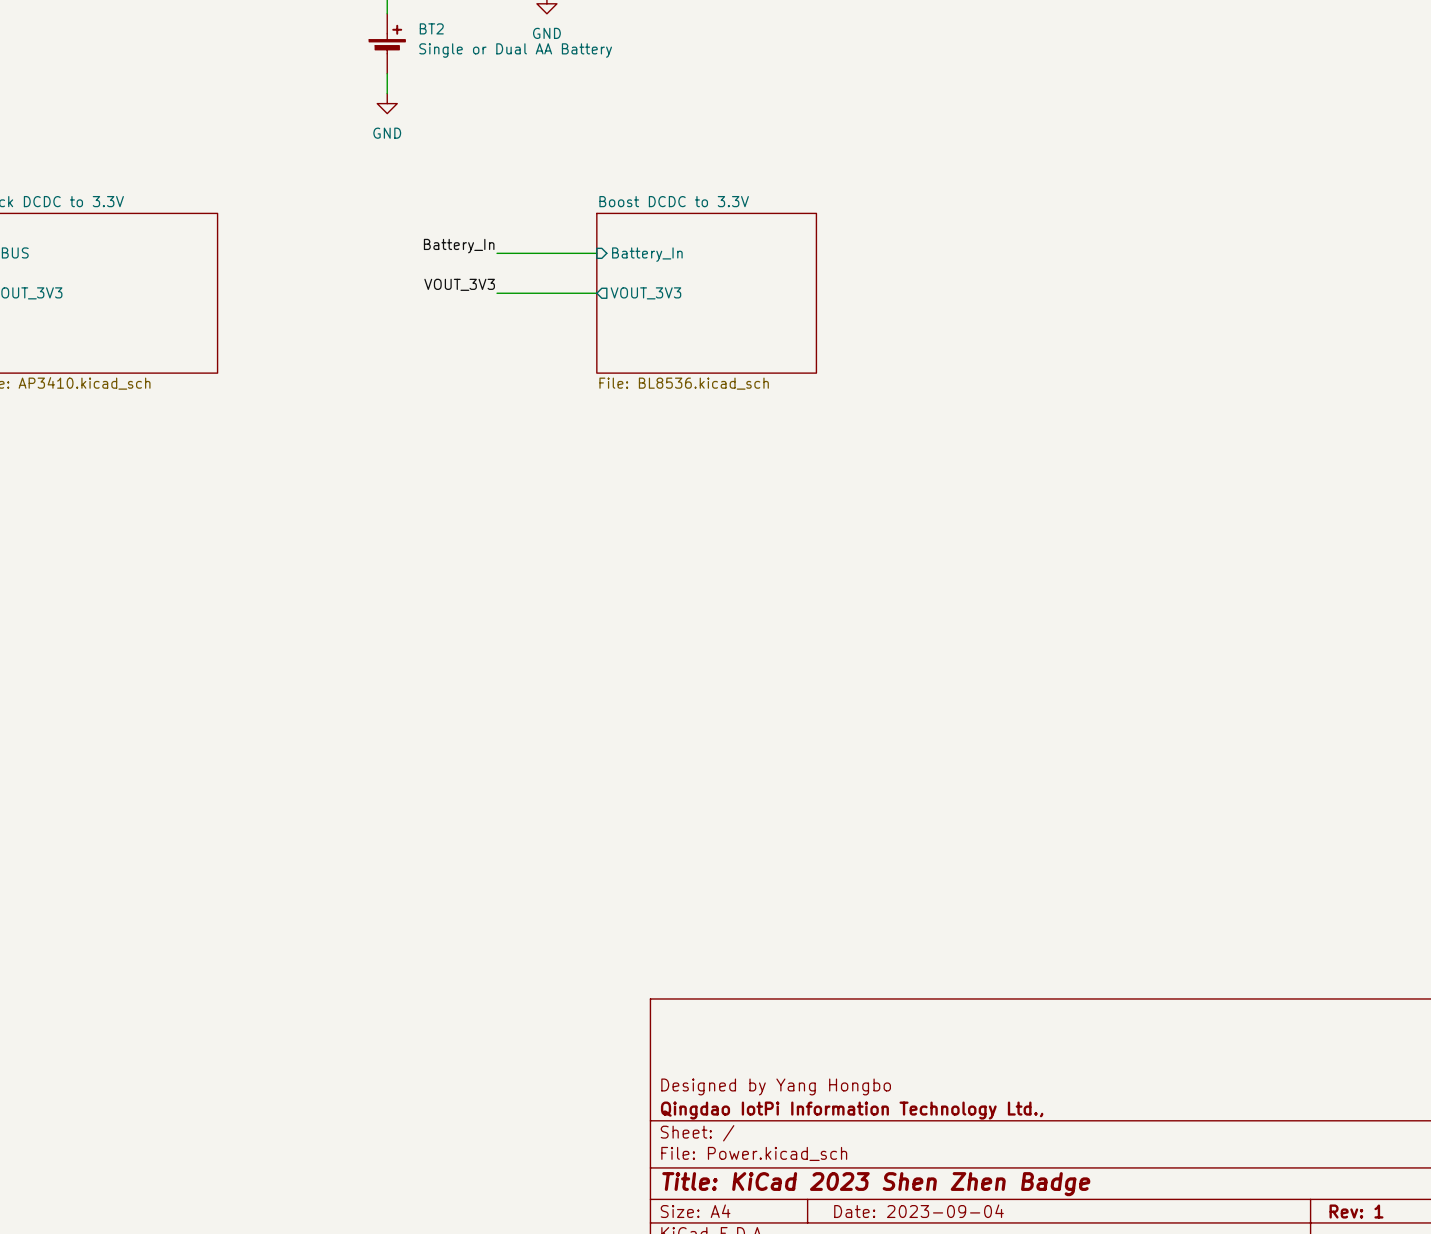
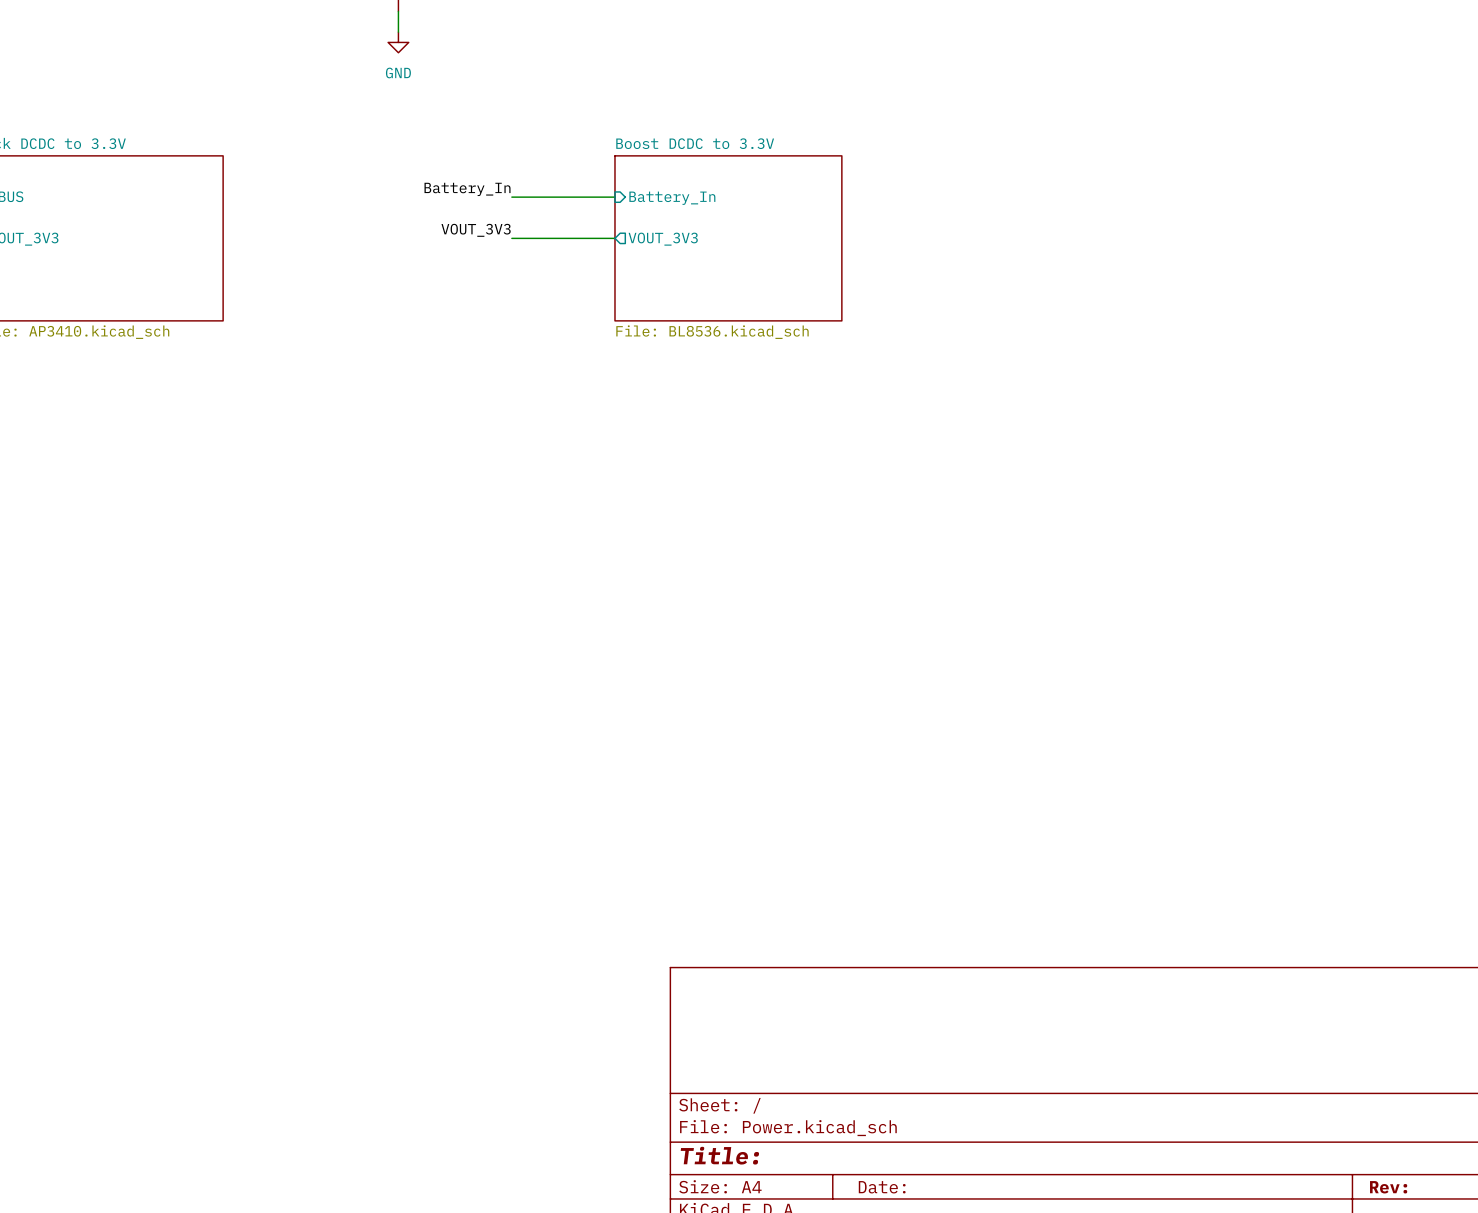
title block: Designed by Yang Hongbo (776, 1086) -> none
title block: Qingdao IotPi Information Technology Ltd., (852, 1110) -> none
title block: Title: KiCad 2023 Shen Zhen Badge (876, 1184) -> Title: (719, 1155)
title block: Date: 2023-09-04 (918, 1211) -> Date: (882, 1187)
title block: Rev: 1 (1356, 1211) -> Rev: (1388, 1187)

